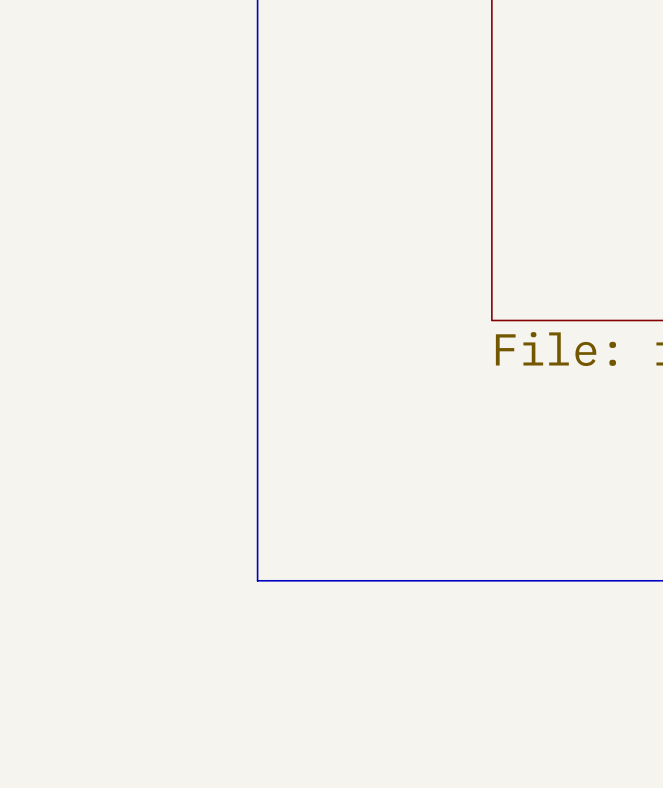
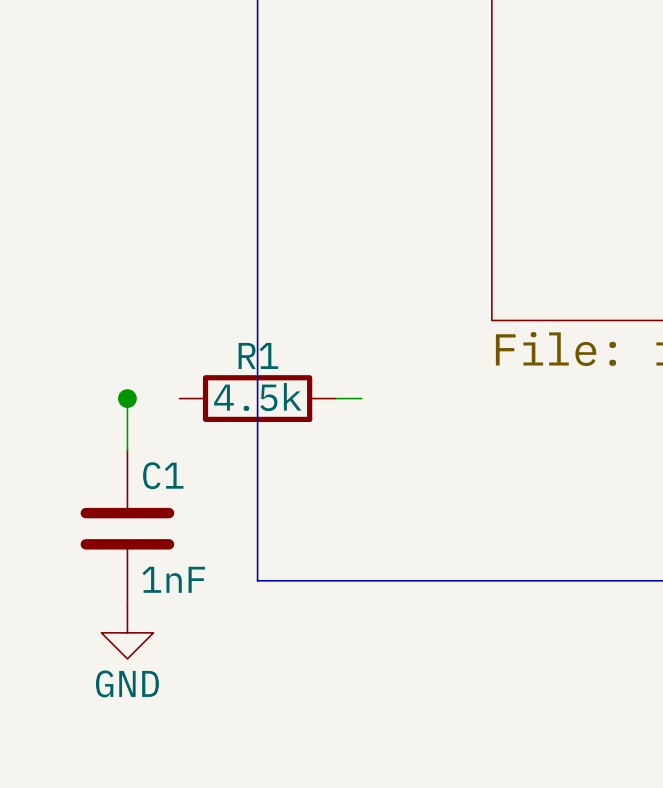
wire: none -> (127, 398) (127, 450)
junction: none -> (127, 398)
R1: none -> 4.5k (257, 398)
wire: none -> (335, 398) (361, 398)
C1: none -> 1nF (127, 528)
power symbol: none -> GND (127, 632)

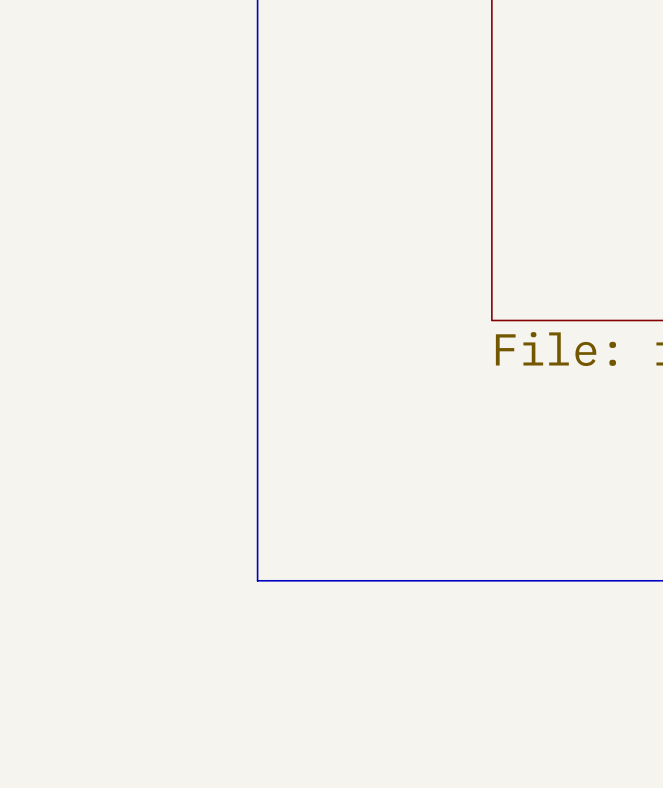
wire: (127, 398) (127, 450) -> none
junction: (127, 398) -> none
R1: 4.5k (257, 398) -> none
wire: (335, 398) (361, 398) -> none
C1: 1nF (127, 528) -> none
power symbol: GND (127, 632) -> none

